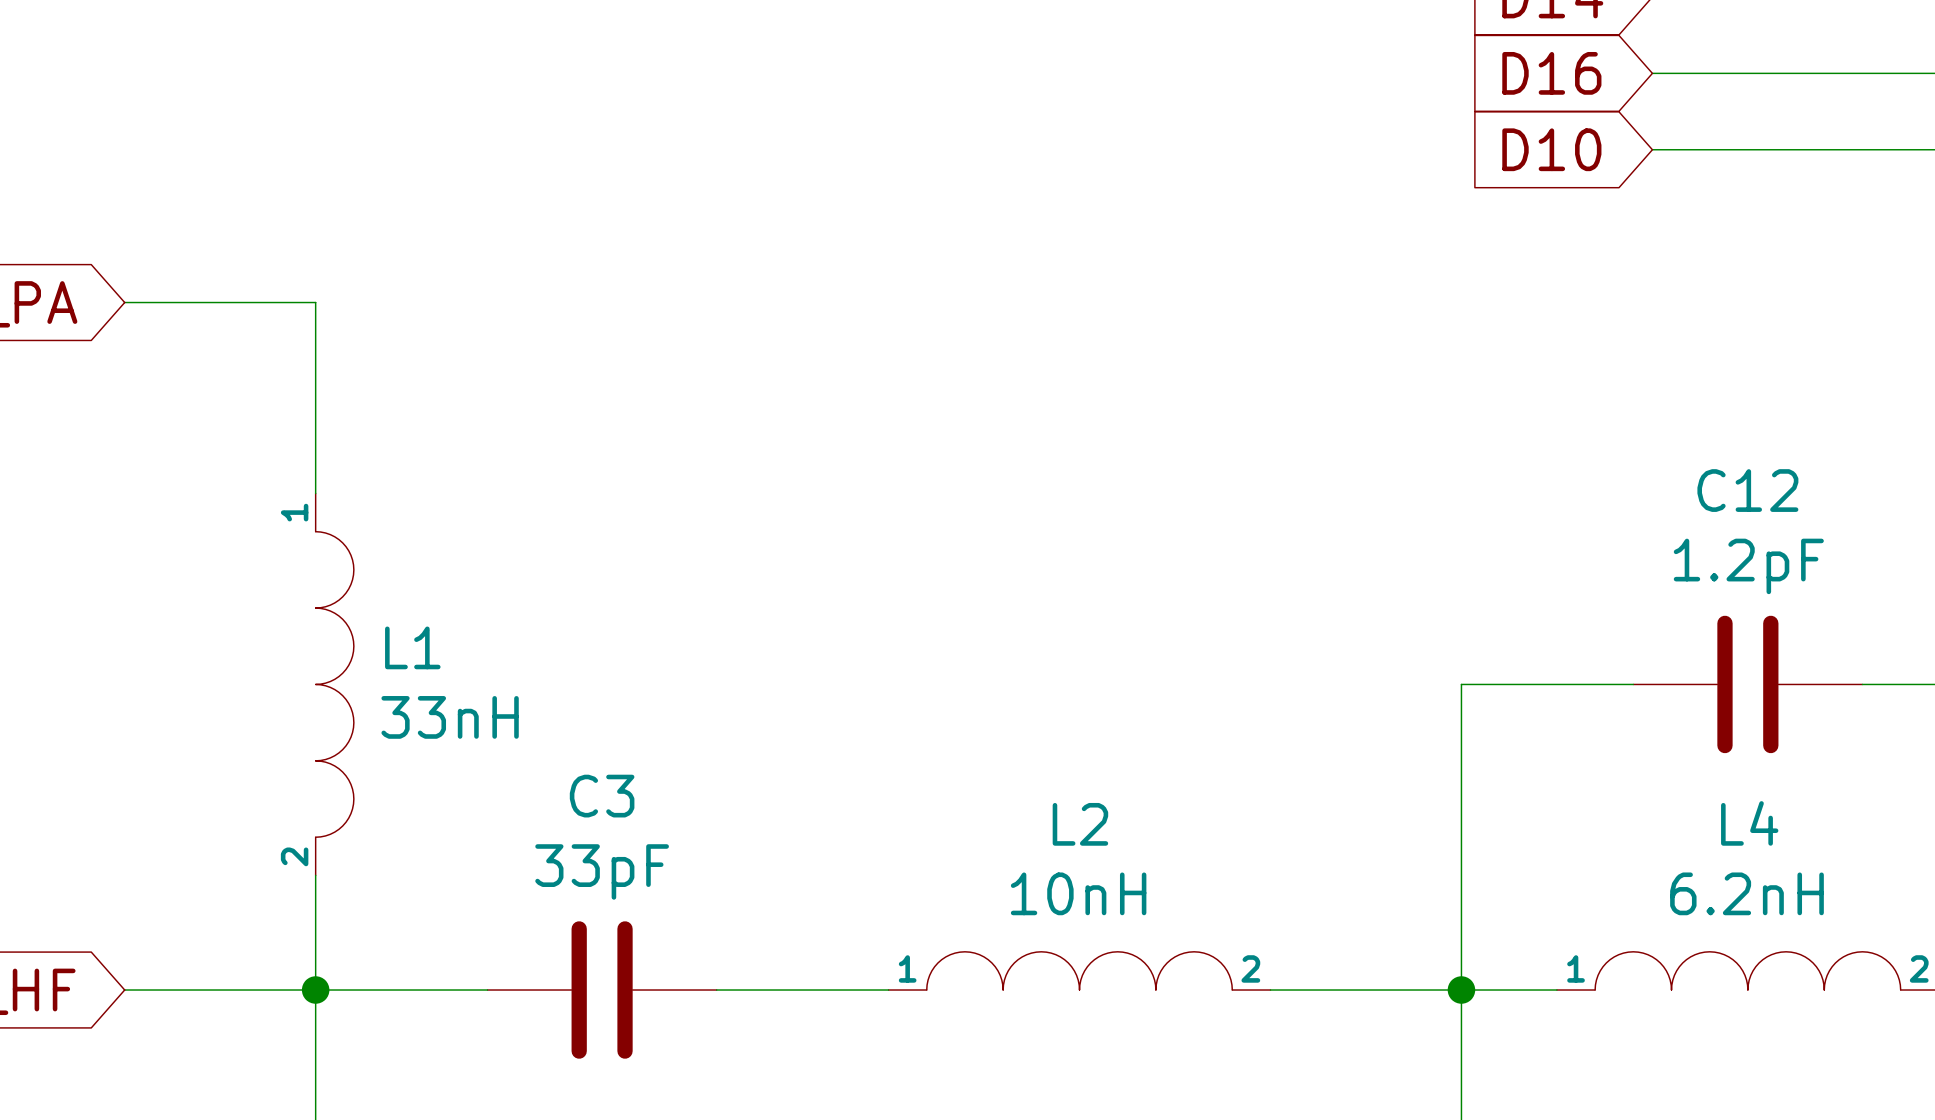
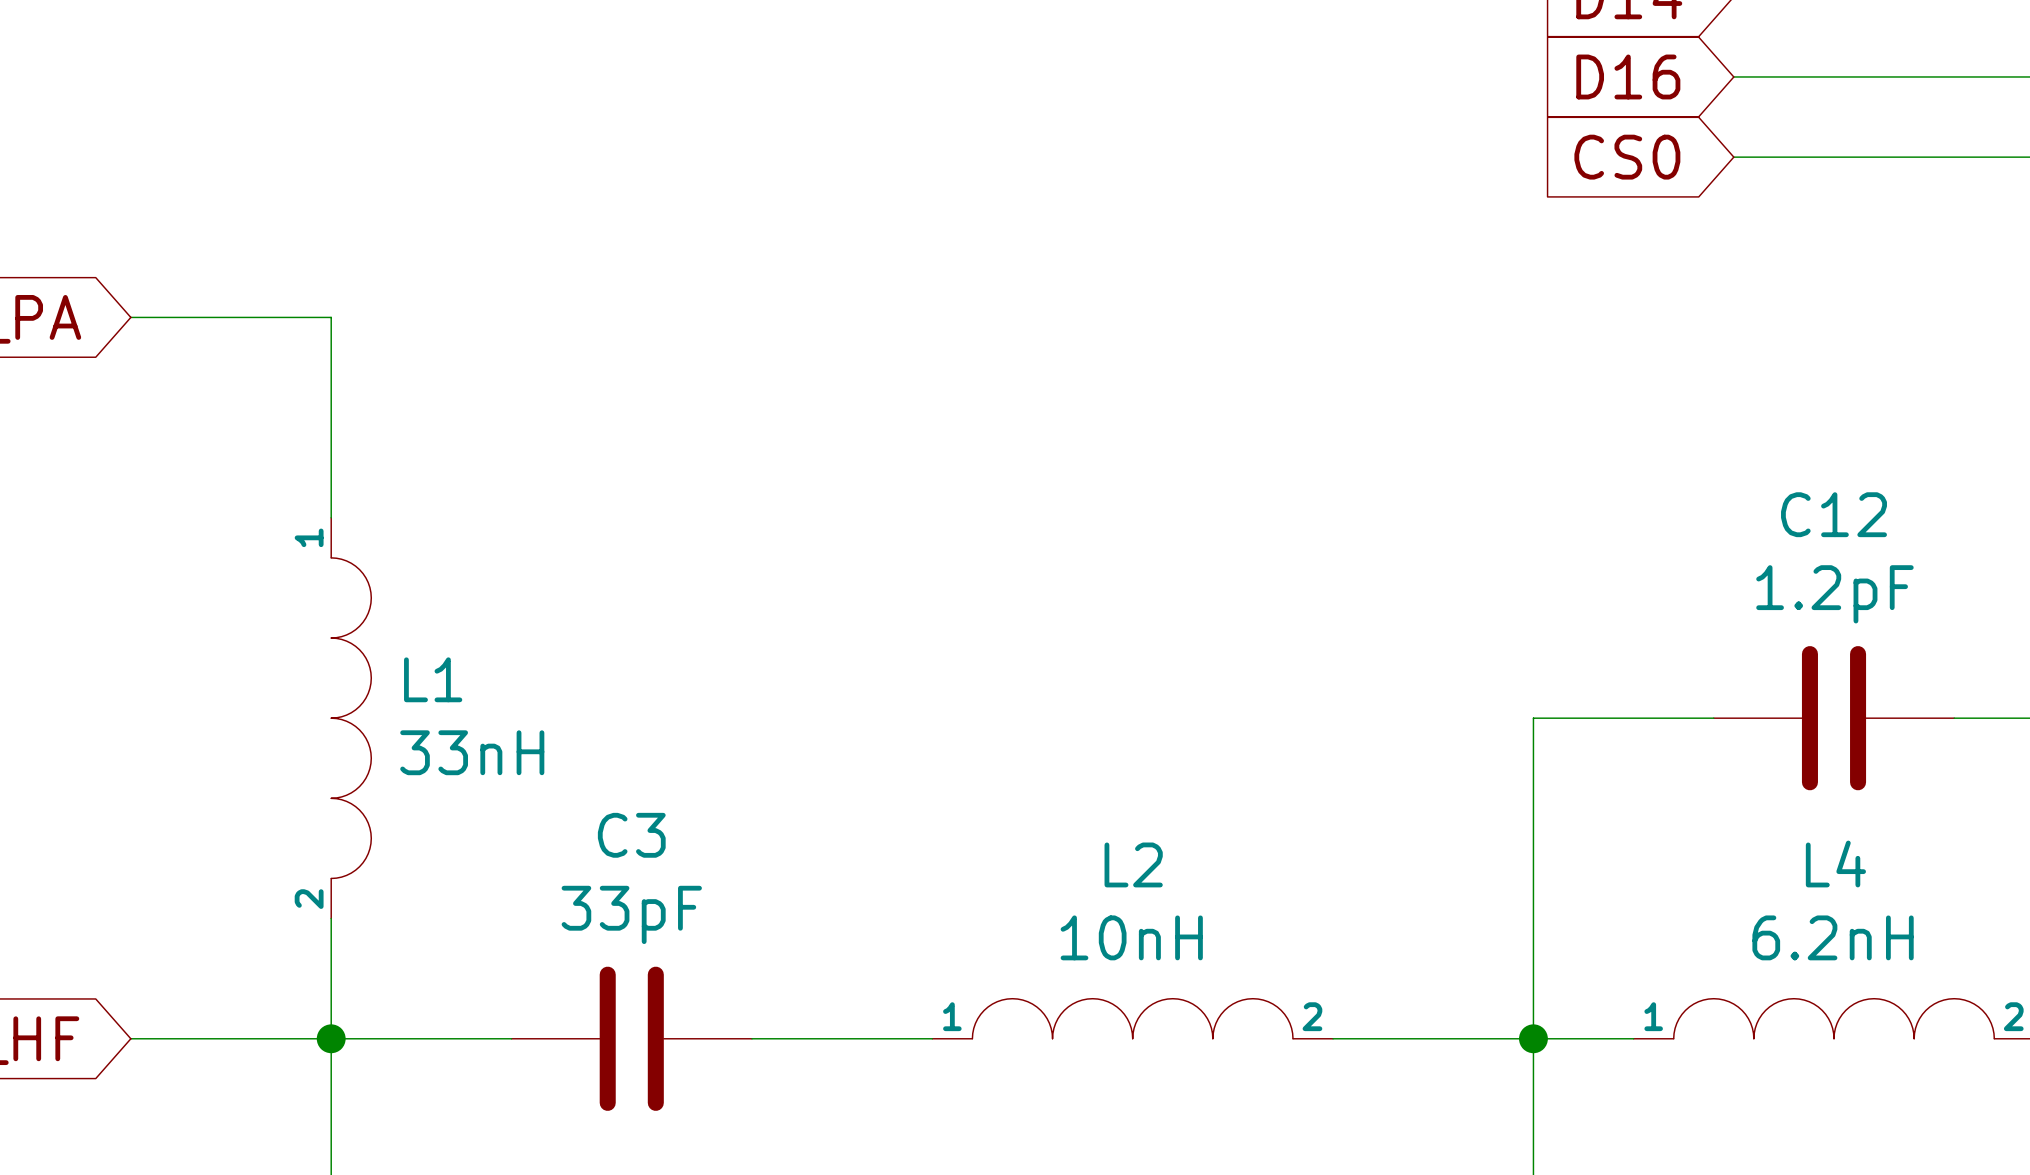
global label: D10 (1551, 149) -> CS0 (1627, 157)

